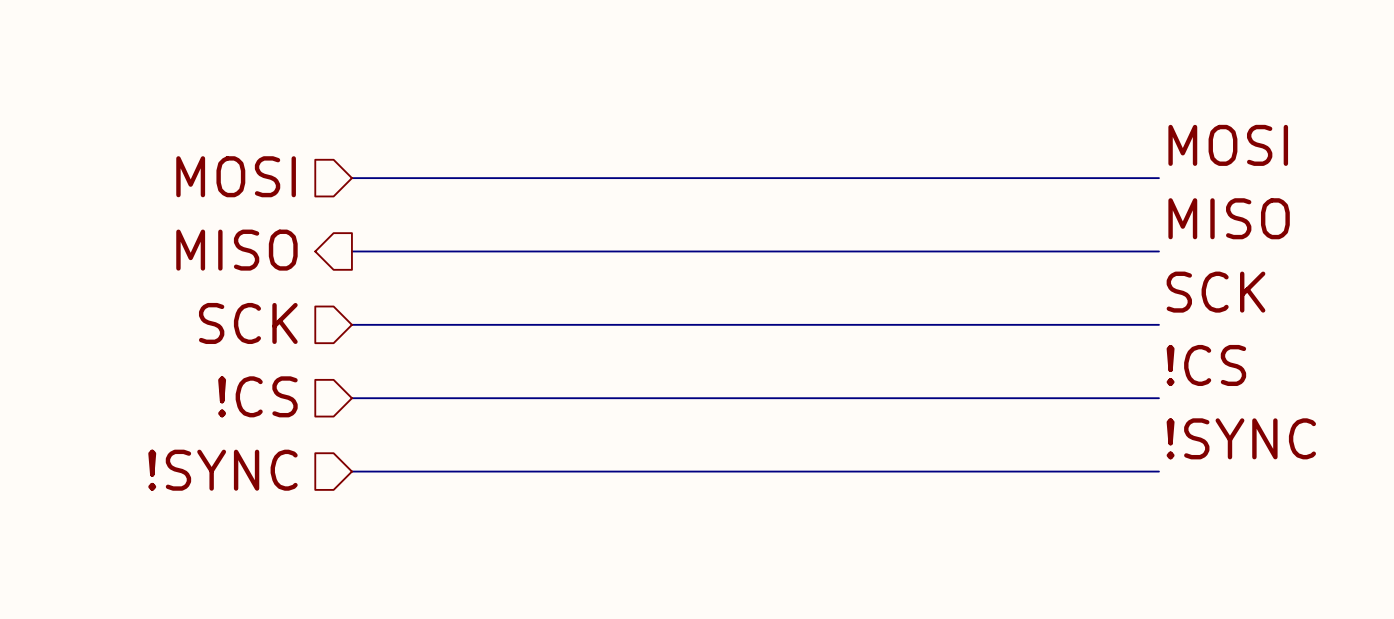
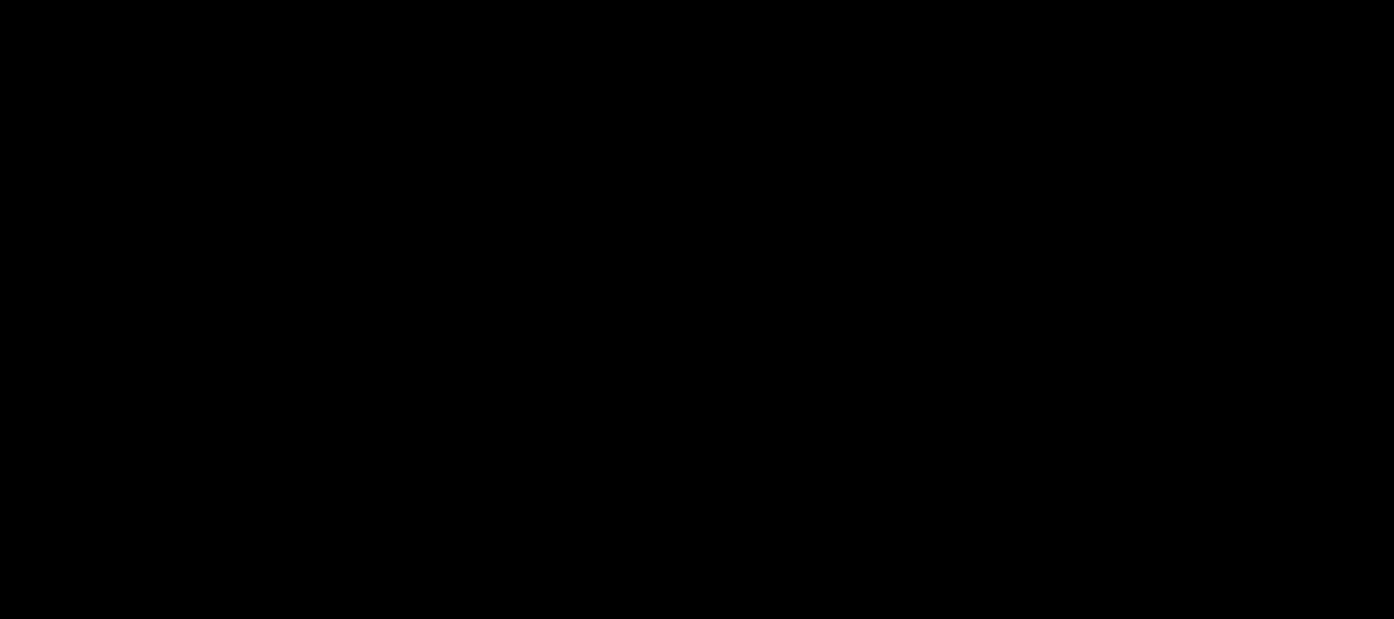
label: MOSI (1228, 145) -> none
hierarchical label: MOSI (236, 176) -> none
wire: (351, 178) (1158, 178) -> none
label: MISO (1229, 218) -> none
hierarchical label: MISO (236, 250) -> none
wire: (351, 251) (1158, 251) -> none
label: SCK (1215, 292) -> none
hierarchical label: SCK (248, 323) -> none
wire: (351, 324) (1158, 324) -> none
label: !CS (1206, 365) -> none
hierarchical label: !CS (257, 396) -> none
wire: (351, 398) (1158, 398) -> none
label: !SYNC (1241, 438) -> none
hierarchical label: !SYNC (222, 470) -> none
wire: (351, 471) (1158, 471) -> none

